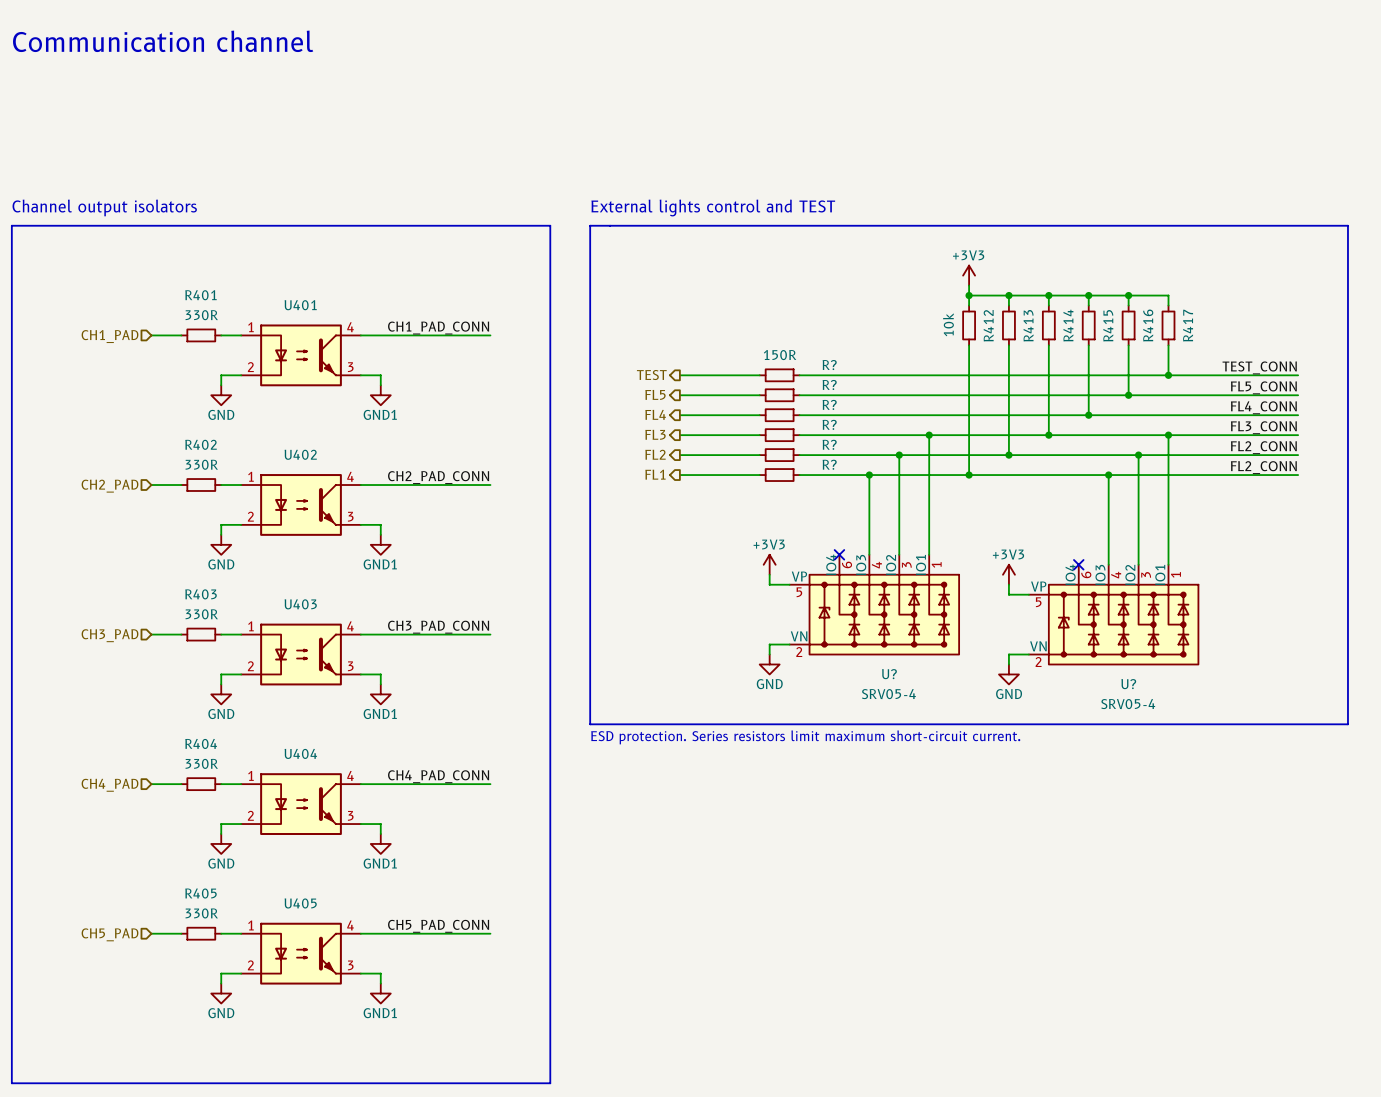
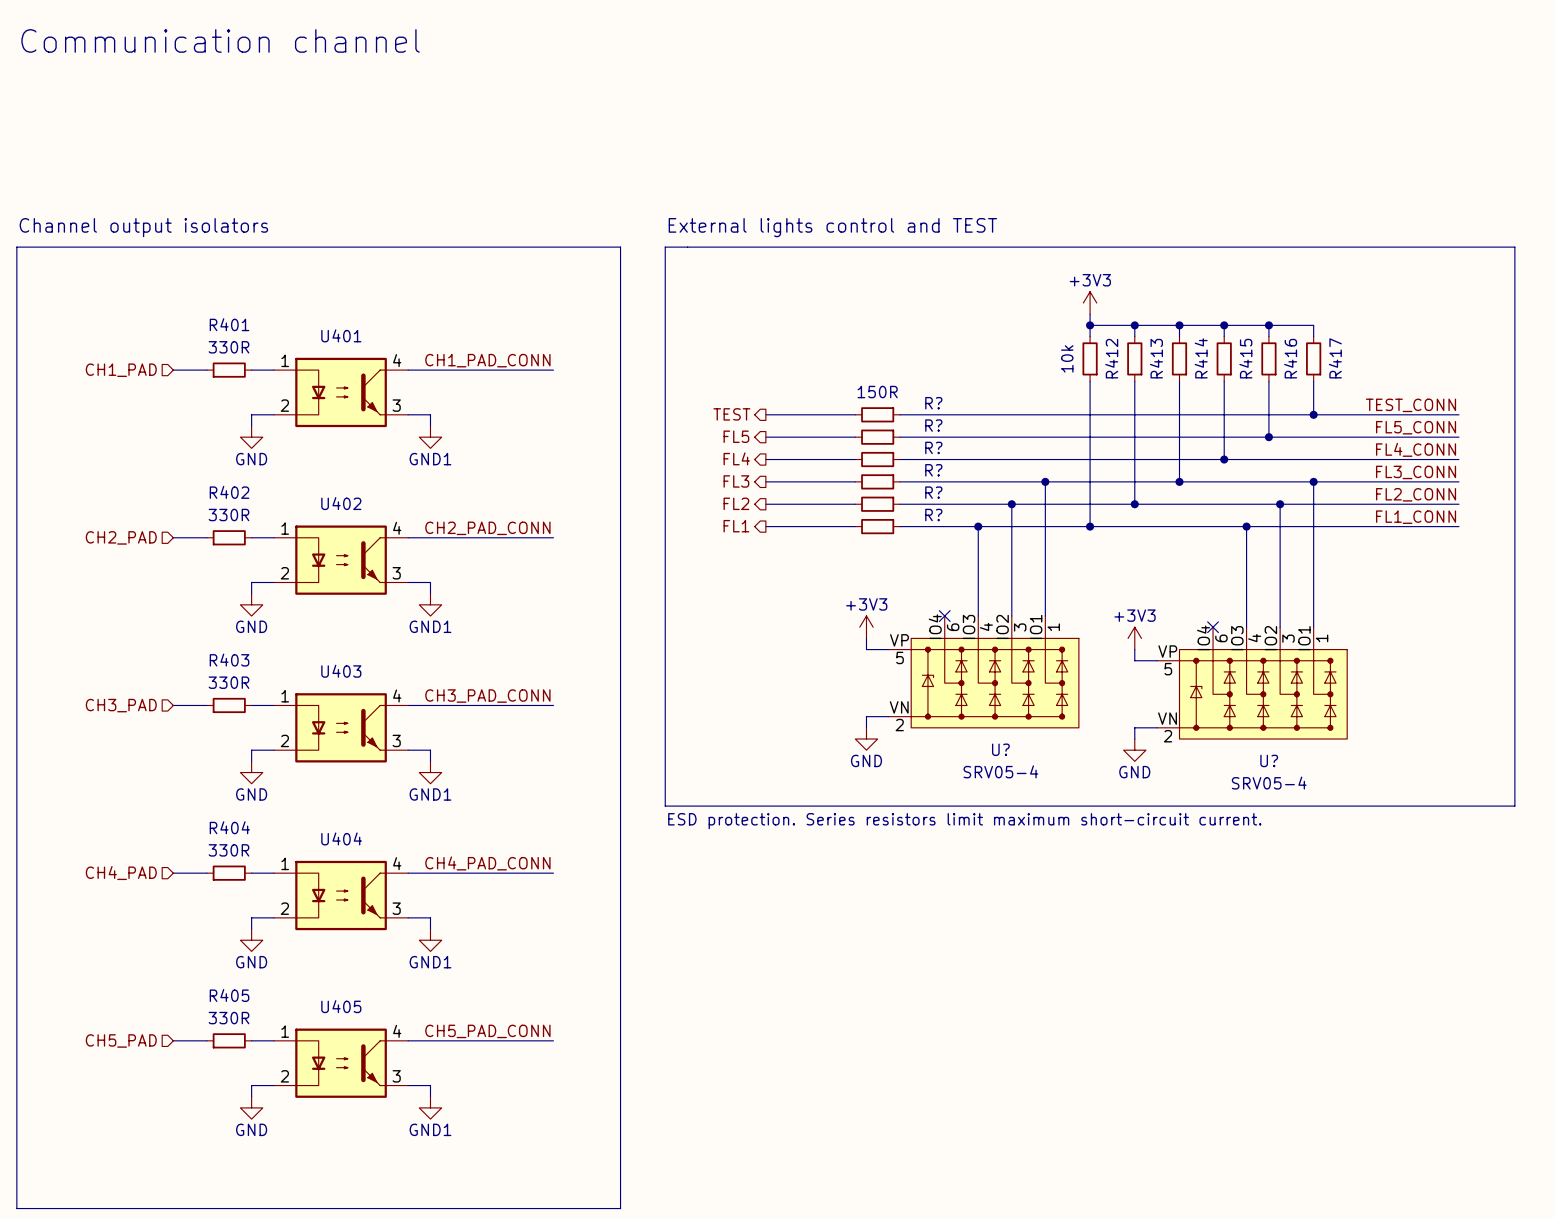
label: FL2_CONN (1263, 467) -> FL1_CONN (1416, 517)

